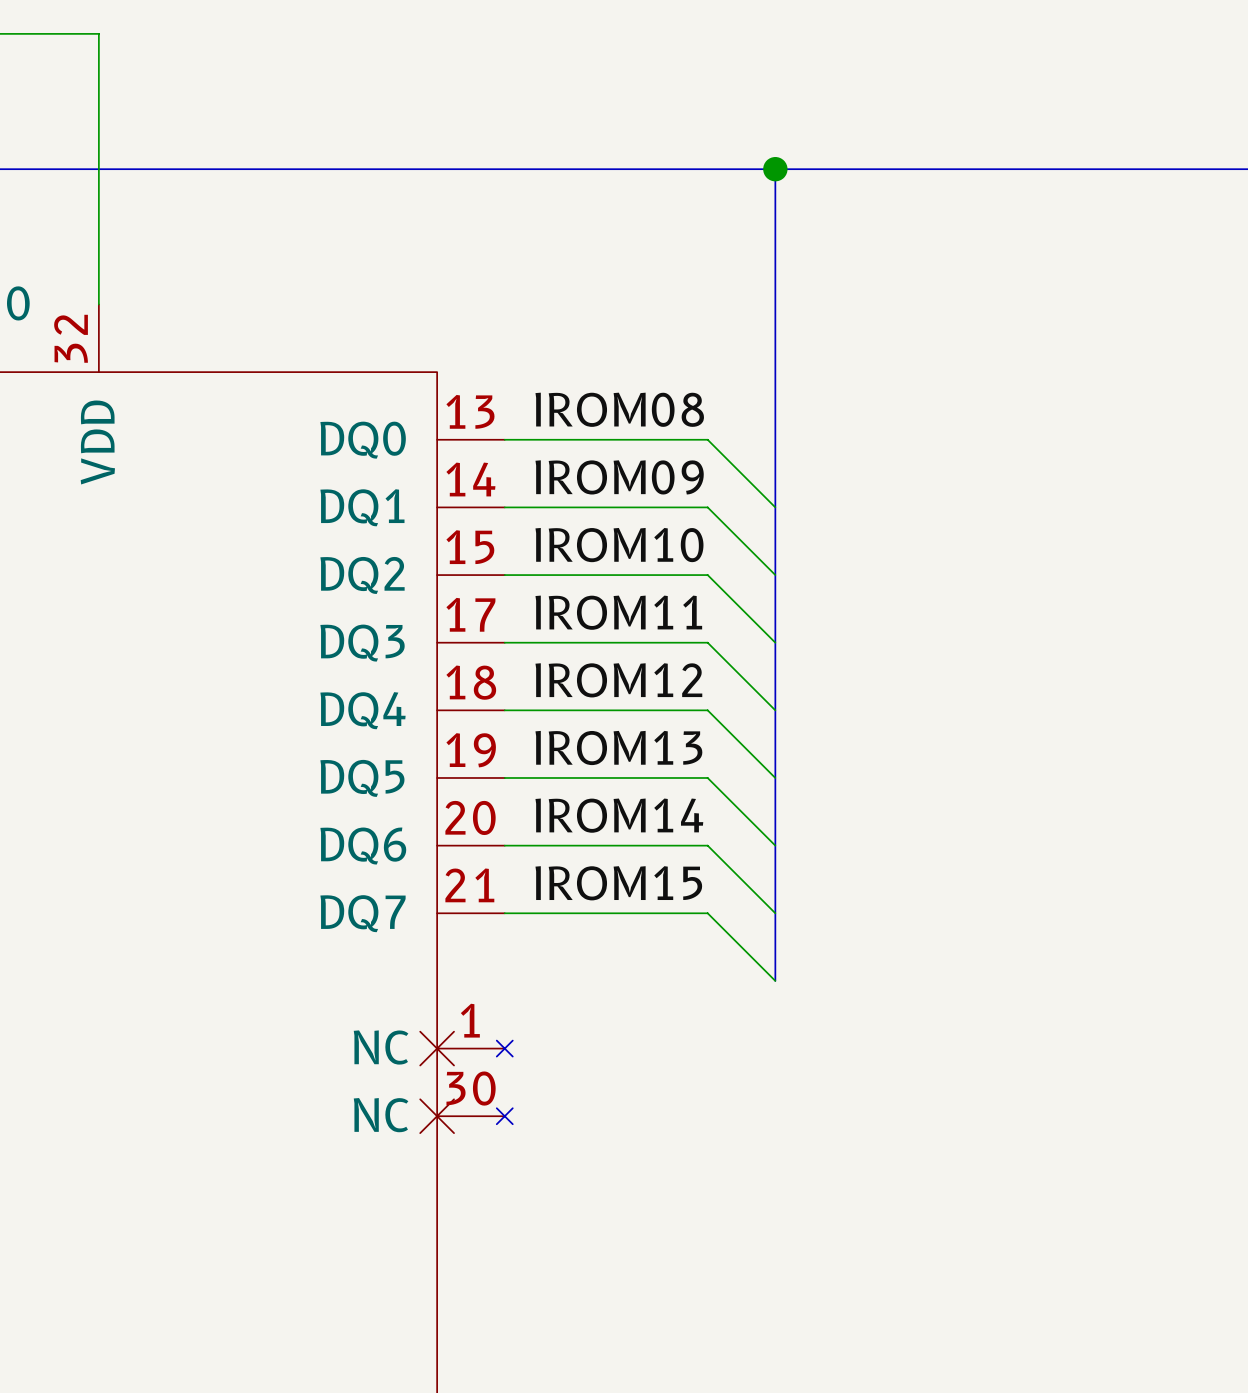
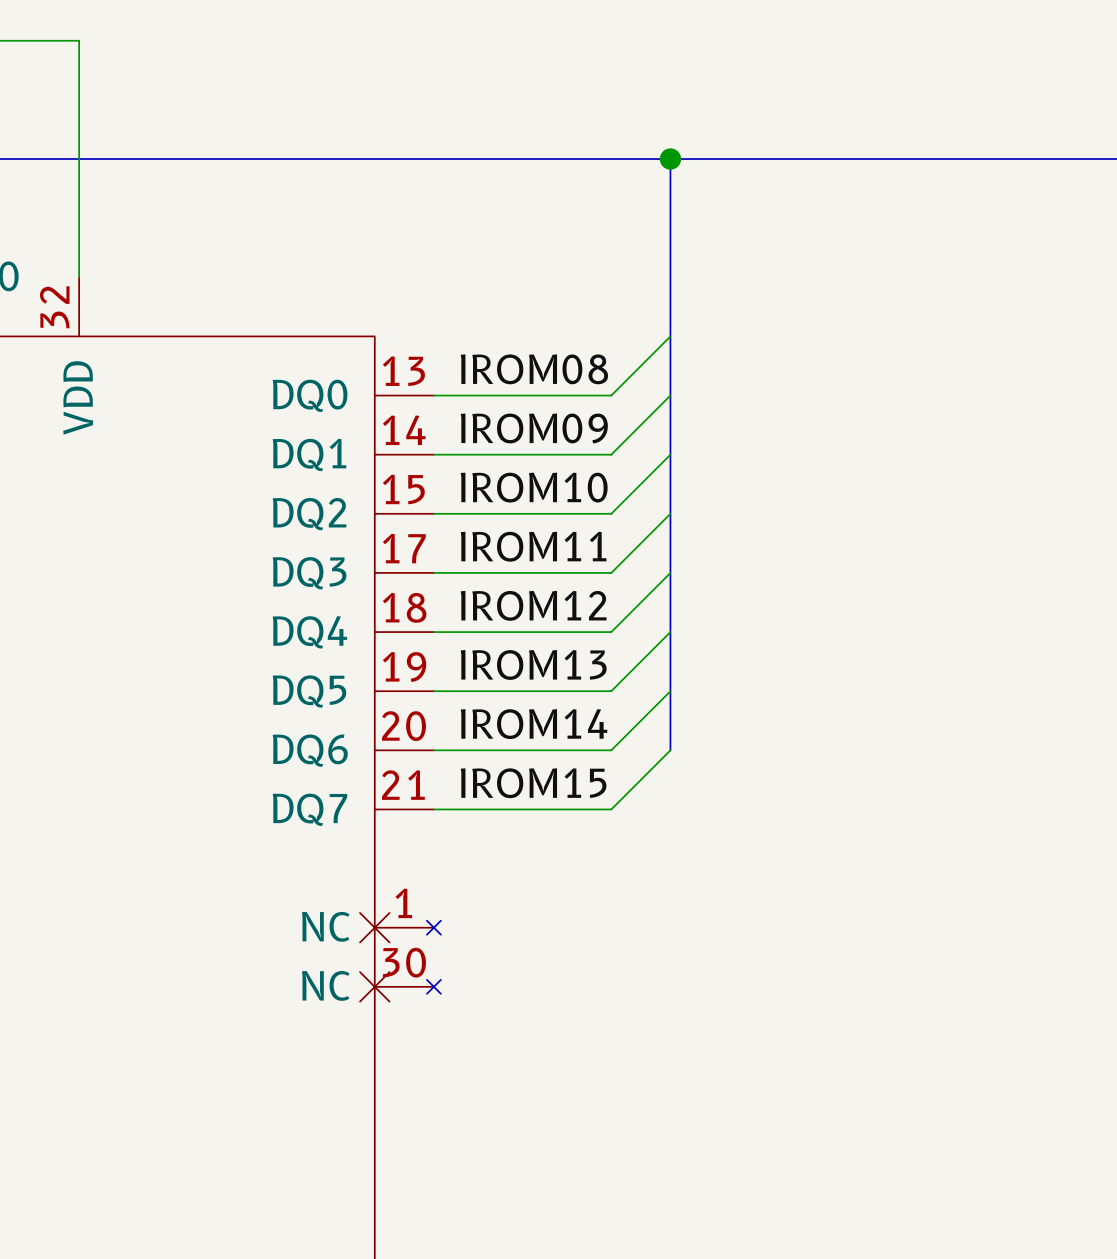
wire: none -> (670, 336) (611, 395)
wire: (707, 439) (775, 507) -> (611, 513) (670, 454)
wire: (707, 507) (775, 575) -> (611, 454) (670, 395)
wire: (707, 575) (775, 642) -> (611, 632) (670, 572)
wire: (707, 642) (775, 710) -> (611, 572) (670, 513)
wire: (707, 710) (775, 777) -> (611, 750) (670, 691)
wire: (707, 777) (775, 845) -> (611, 691) (670, 632)
wire: (707, 845) (775, 913) -> none
bus: (775, 845) (775, 980) -> none
wire: (707, 913) (775, 980) -> (611, 809) (670, 750)

